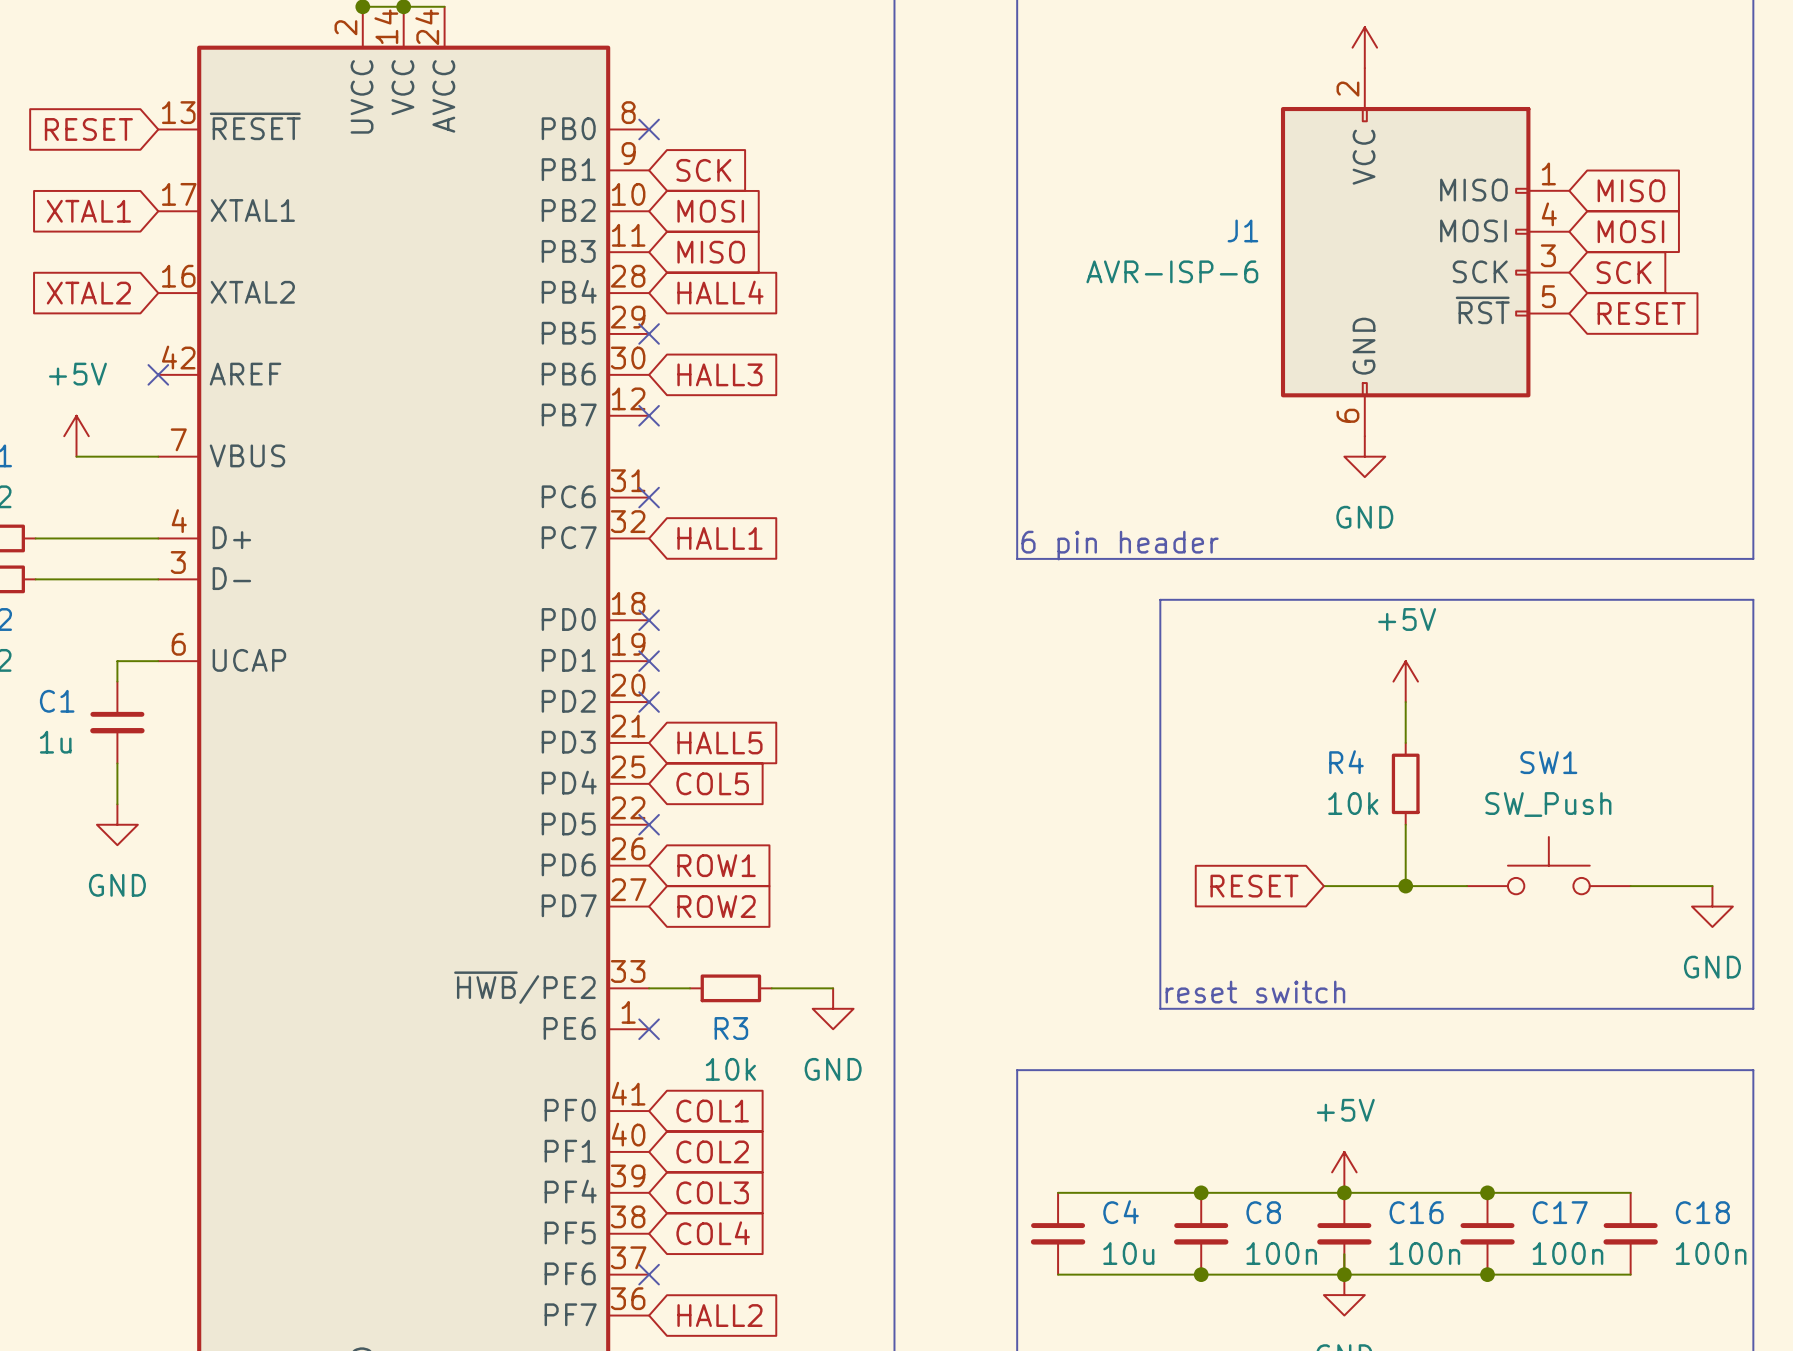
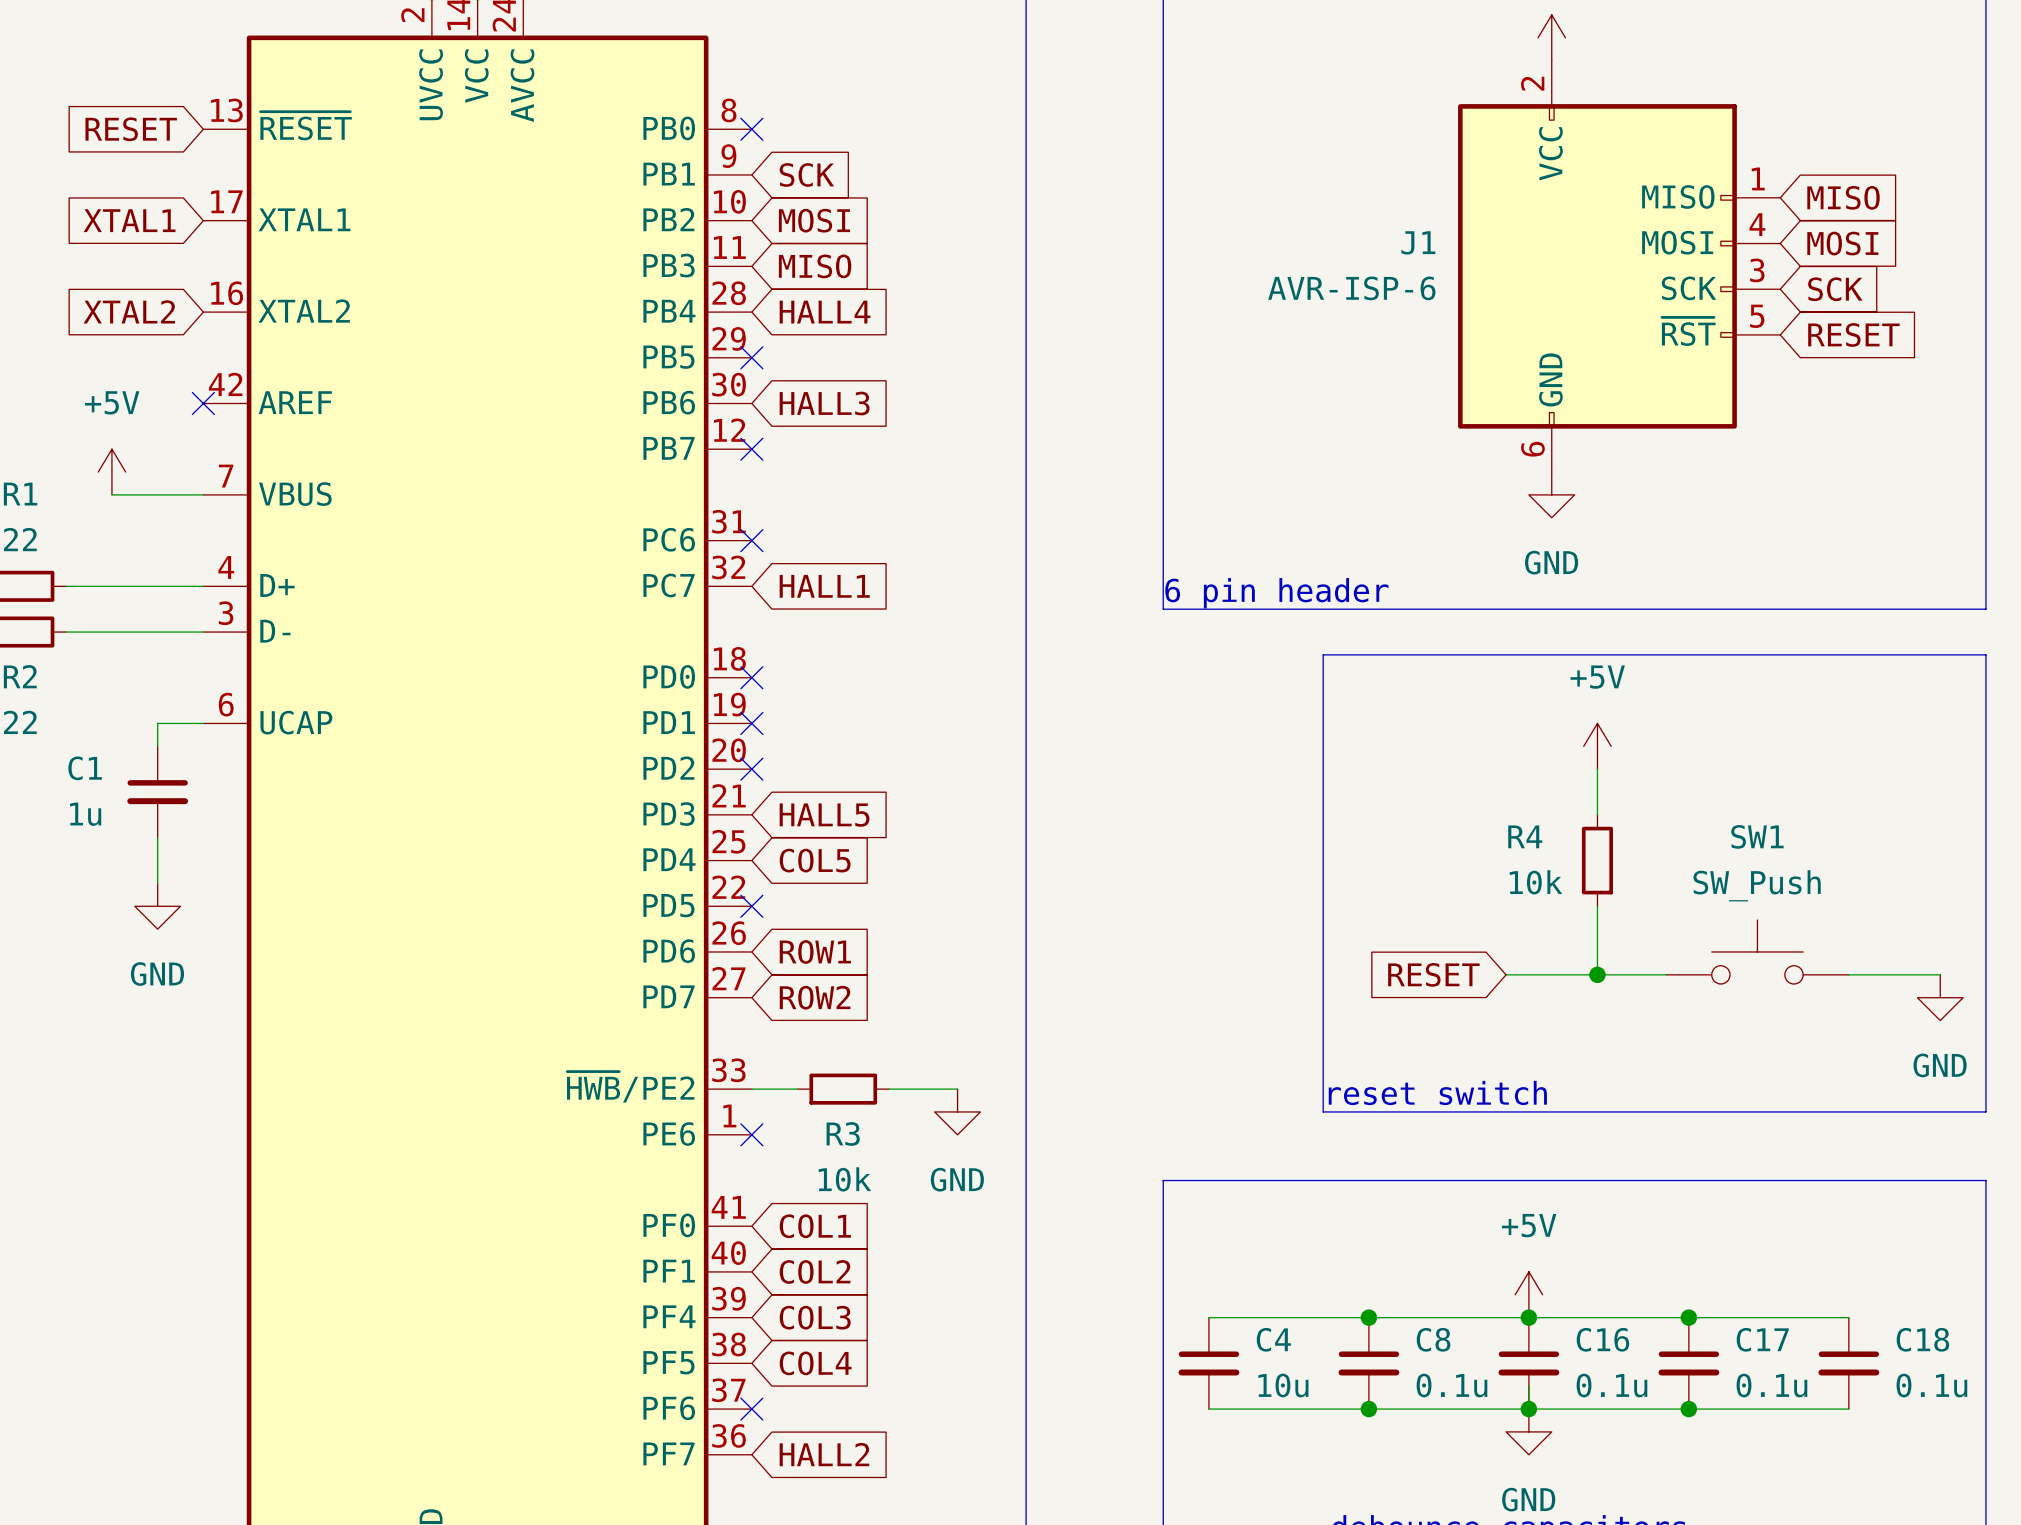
C8 value: 100n (1281, 1253) -> 0.1u (1451, 1385)
C16 value: 100n (1424, 1253) -> 0.1u (1611, 1385)
C17 value: 100n (1567, 1253) -> 0.1u (1771, 1385)
C18 value: 100n (1711, 1253) -> 0.1u (1931, 1385)

